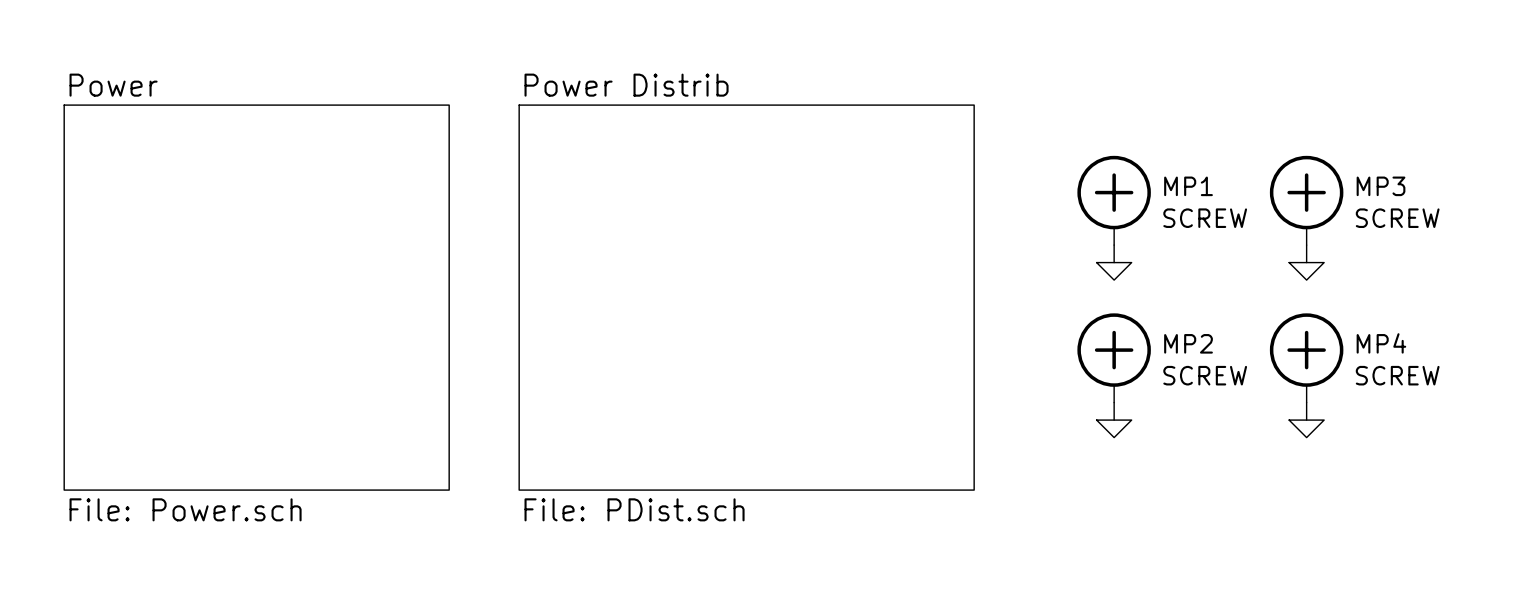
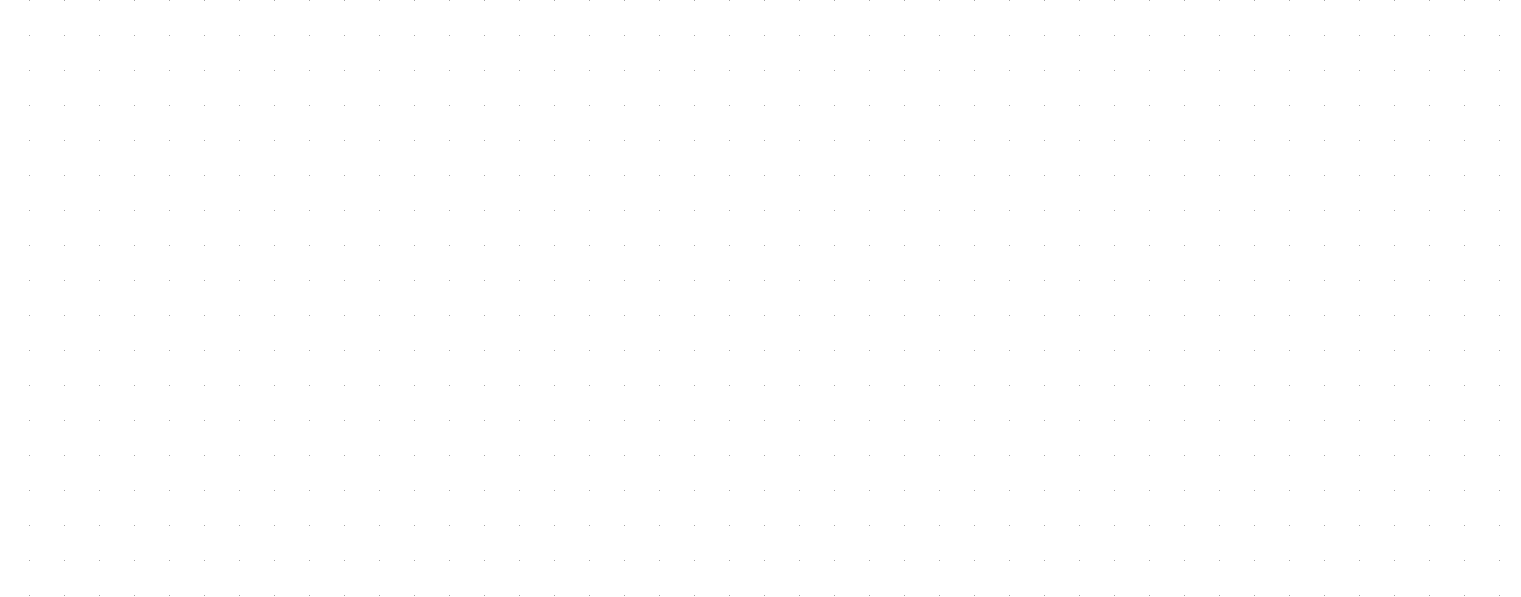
MP1: SCREW (1114, 200) -> none
MP3: SCREW (1306, 200) -> none
wire: (1114, 245) (1114, 262) -> none
wire: (1306, 245) (1306, 262) -> none
power symbol: (1114, 271) -> none
power symbol: (1306, 271) -> none
sheet Power: File: Power.sch (256, 297) -> none
sheet Power Distrib: File: PDist.sch (746, 297) -> none
MP2: SCREW (1114, 357) -> none
MP4: SCREW (1306, 357) -> none
wire: (1114, 402) (1114, 420) -> none
wire: (1306, 402) (1306, 420) -> none
power symbol: (1114, 428) -> none
power symbol: (1306, 428) -> none

